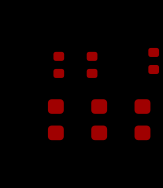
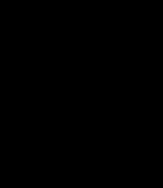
part: (153, 60) -> none
part: (58, 64) -> none
part: (92, 64) -> none
part: (55, 119) -> none
part: (99, 119) -> none
part: (142, 119) -> none

